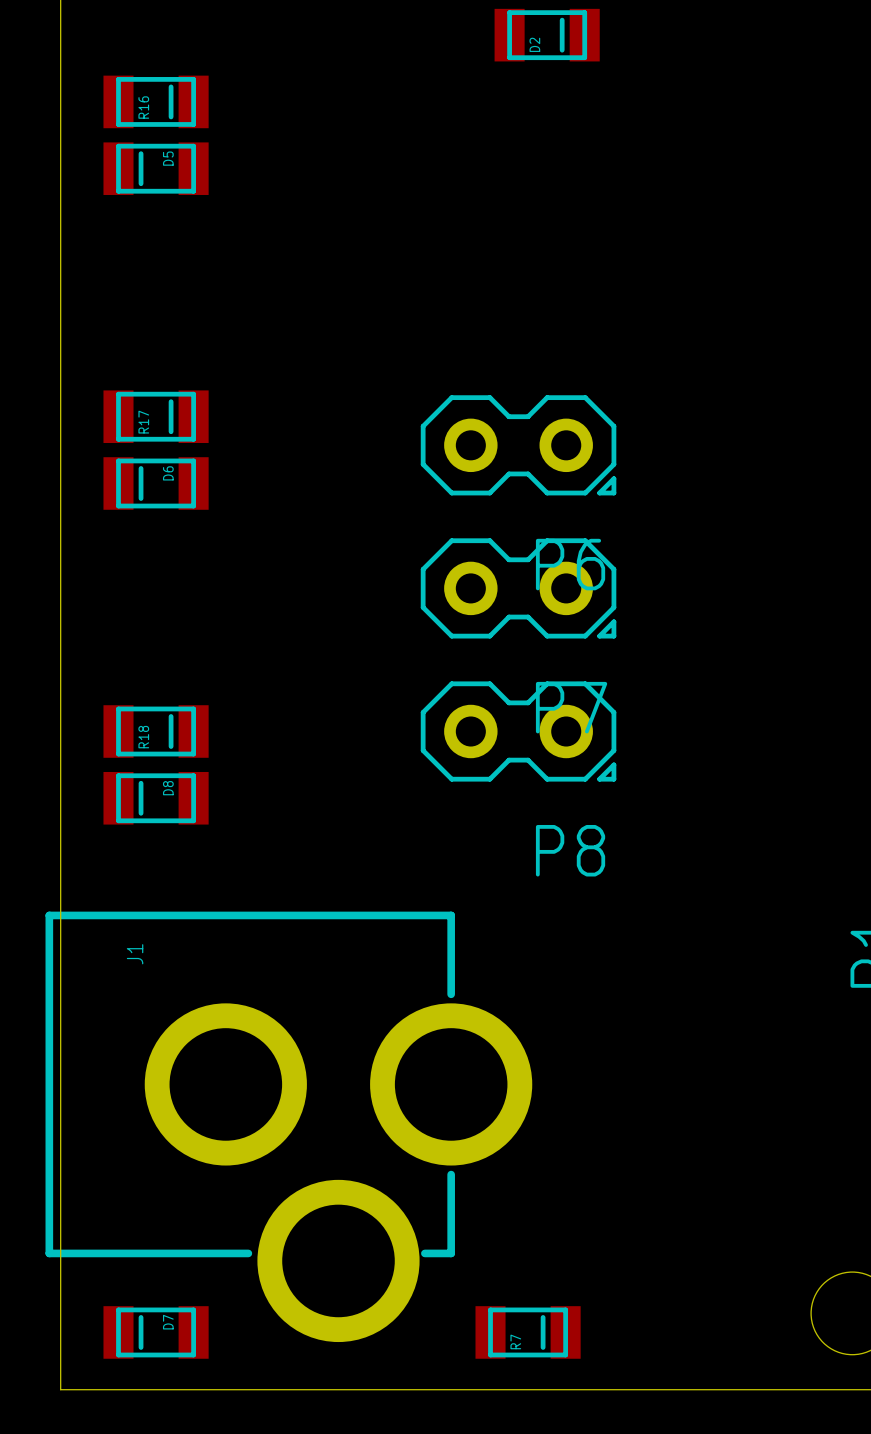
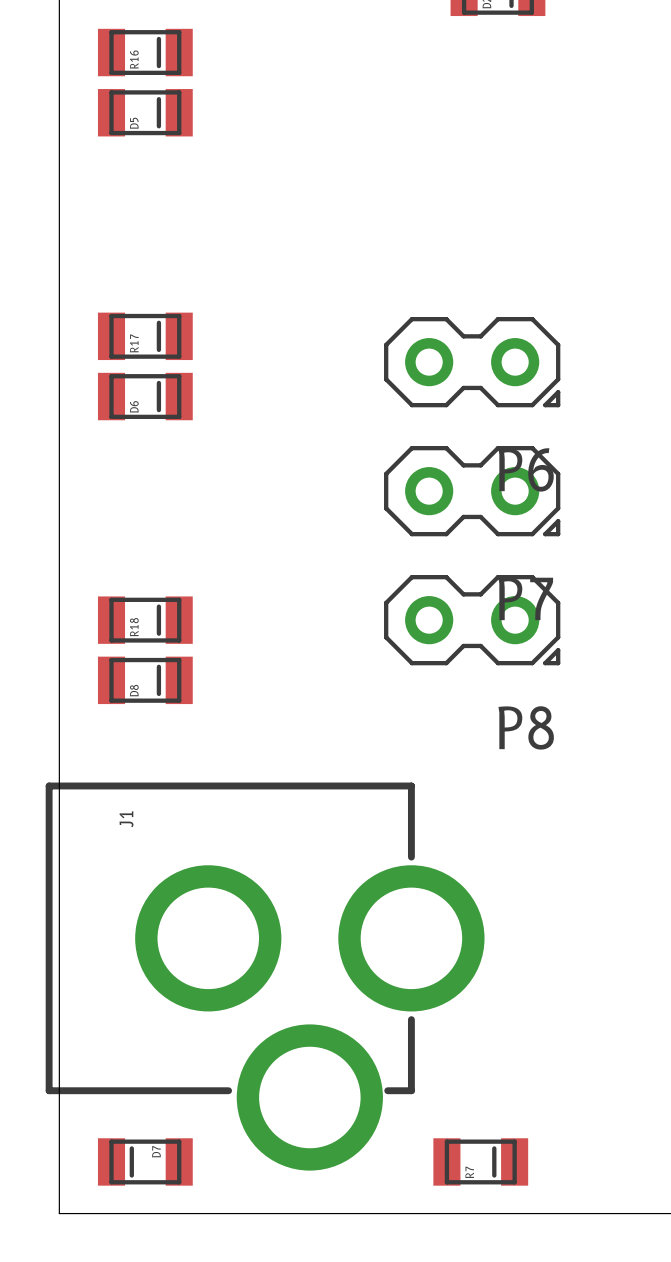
D5 rotation: 0° (156, 168) -> 180° (145, 112)
D6 rotation: 0° (156, 483) -> 180° (145, 396)
D8 rotation: 0° (156, 798) -> 180° (145, 680)

